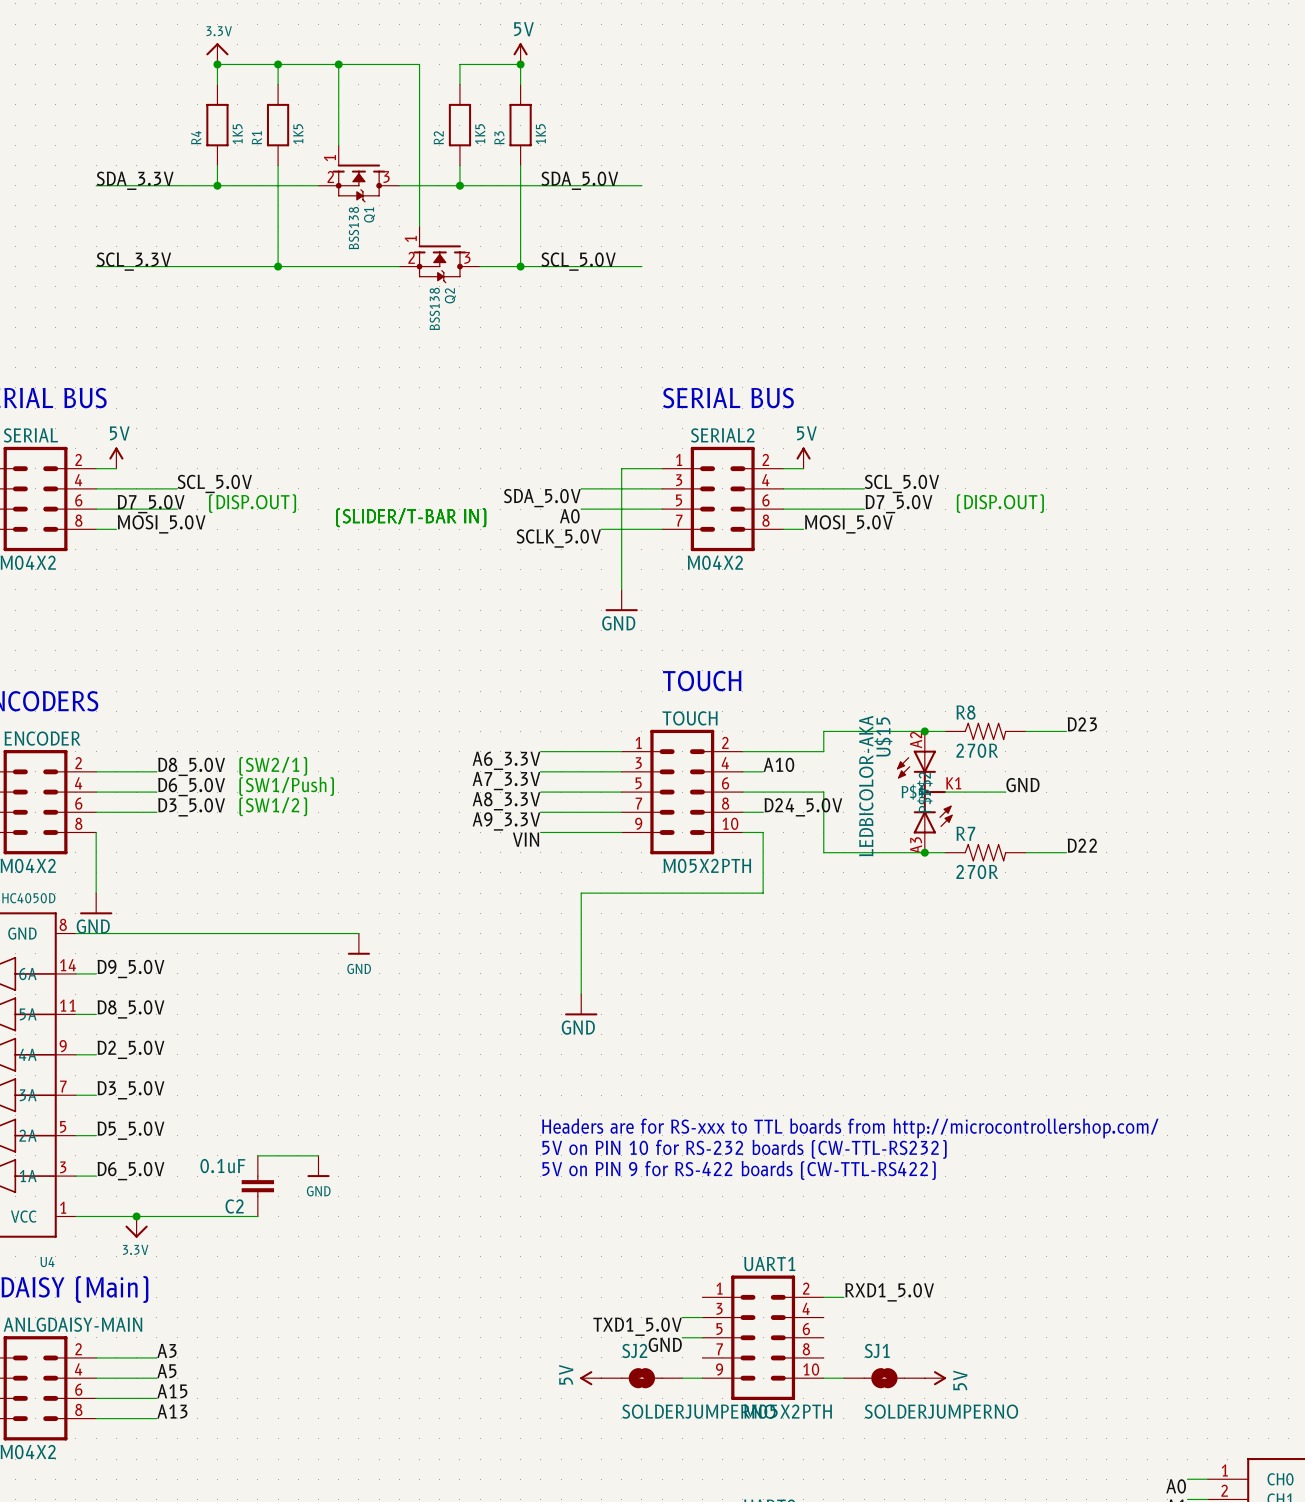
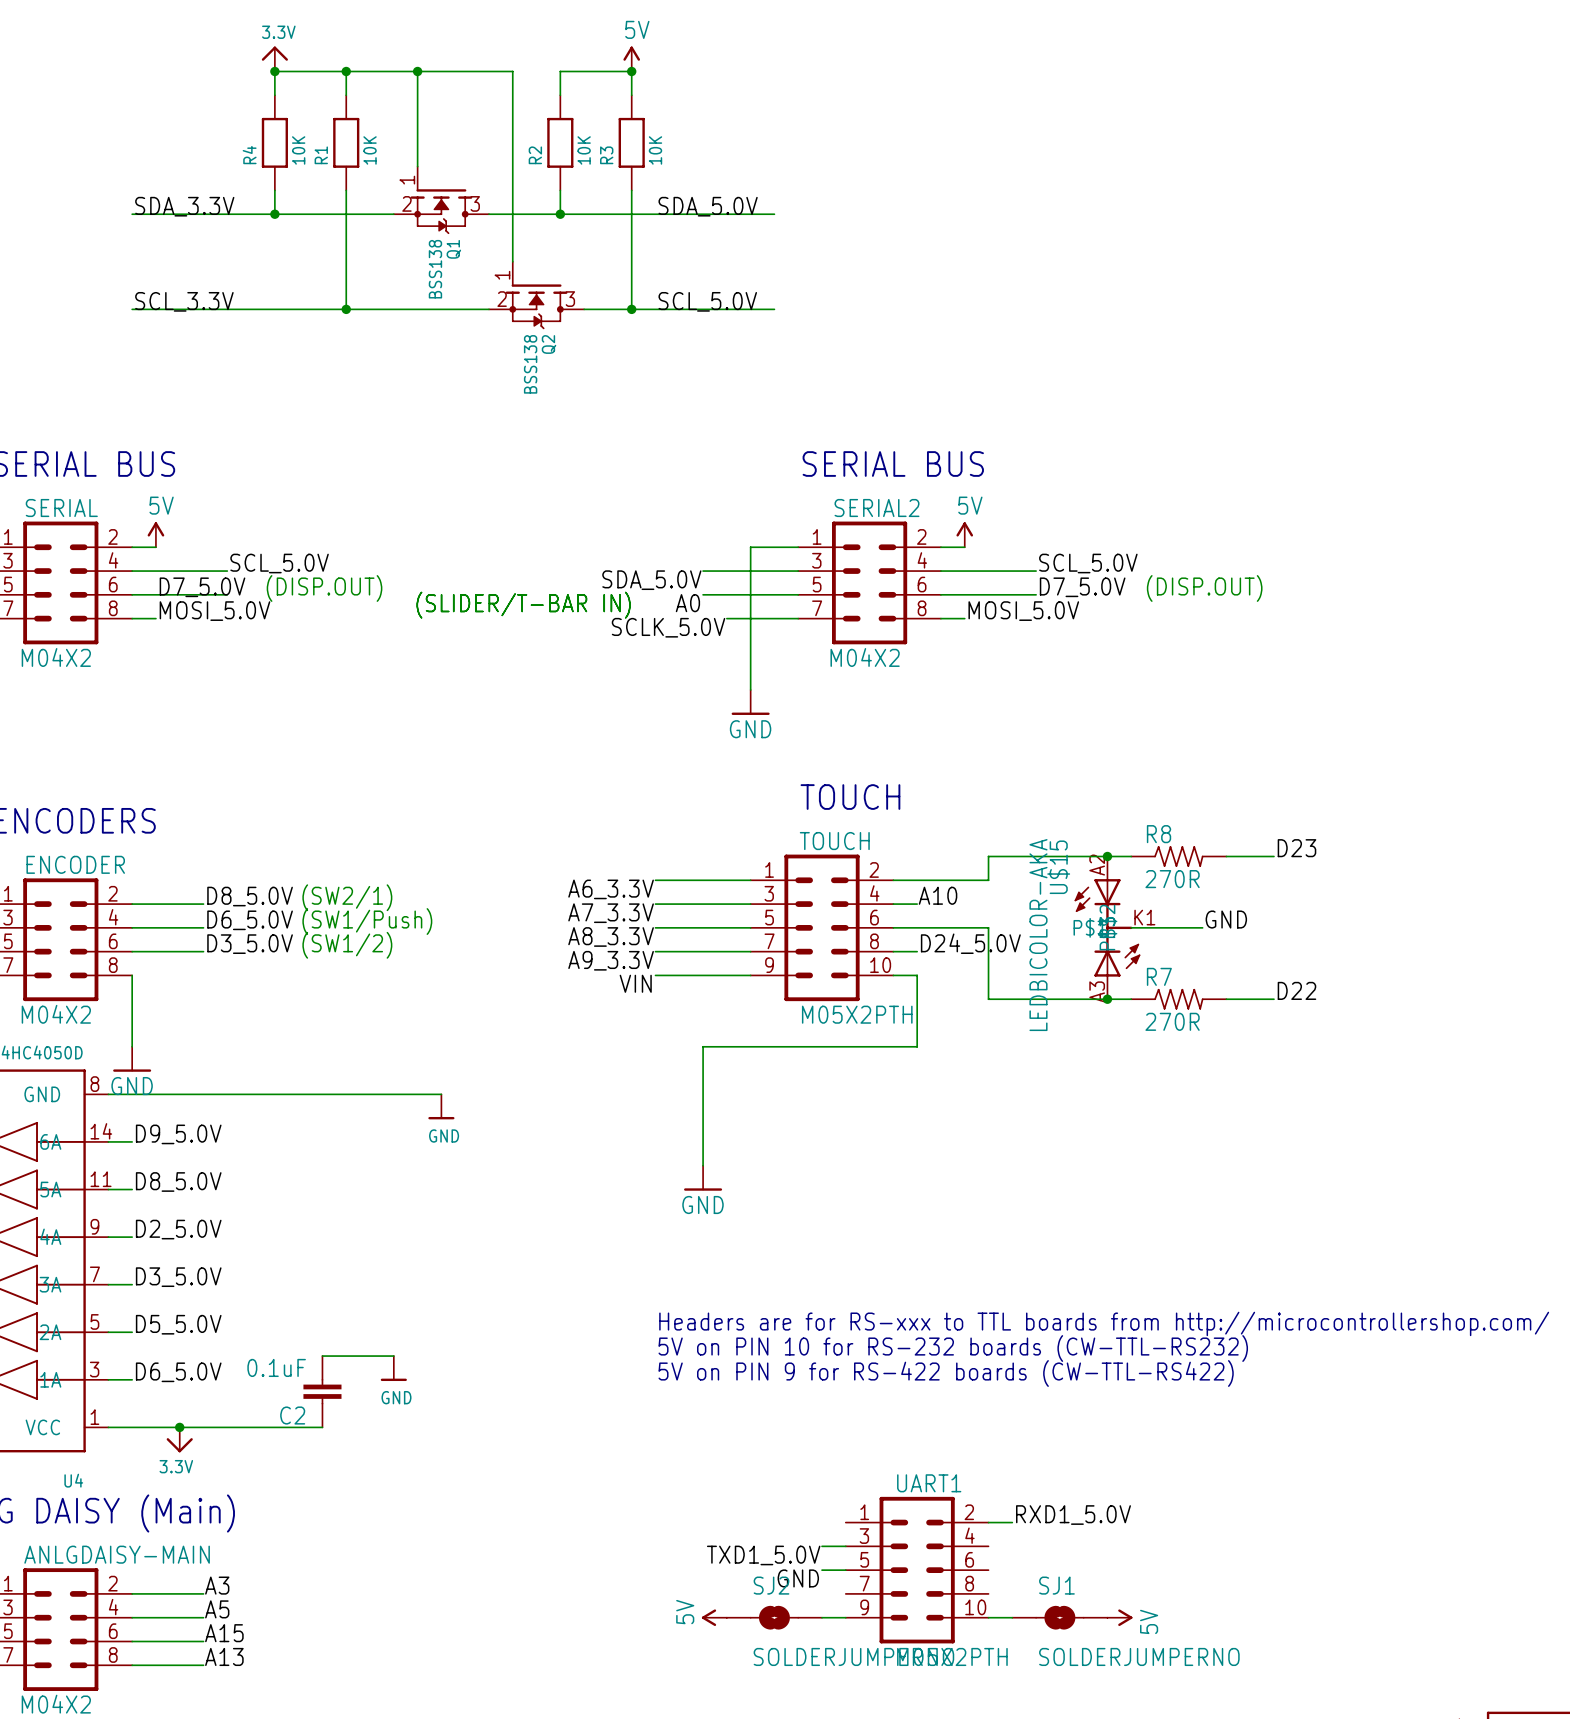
R4 value: 1K5 (237, 134) -> 10K (298, 150)
R1 value: 1K5 (298, 134) -> 10K (370, 150)
R2 value: 1K5 (480, 134) -> 10K (584, 150)
R3 value: 1K5 (540, 134) -> 10K (655, 150)

